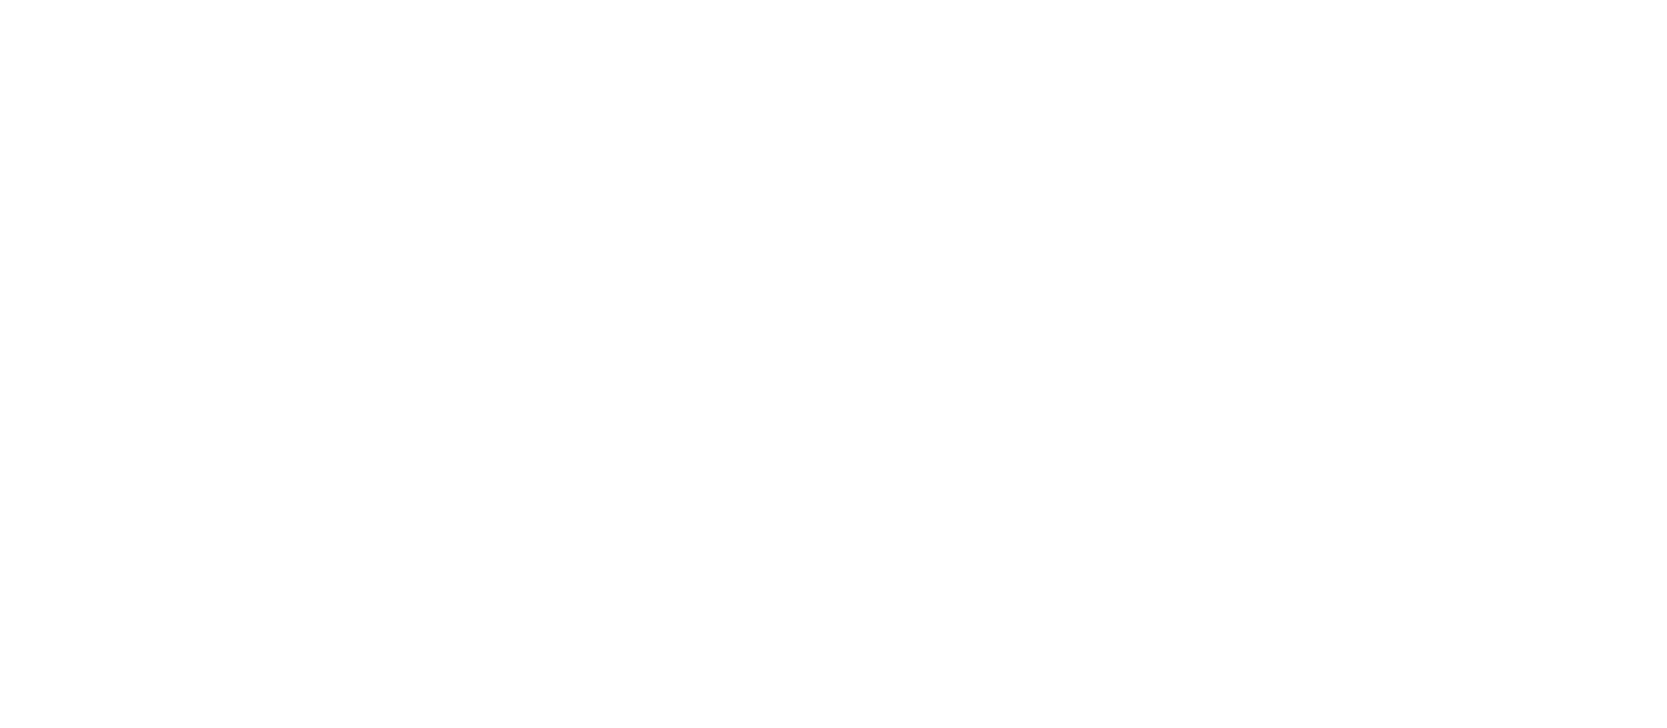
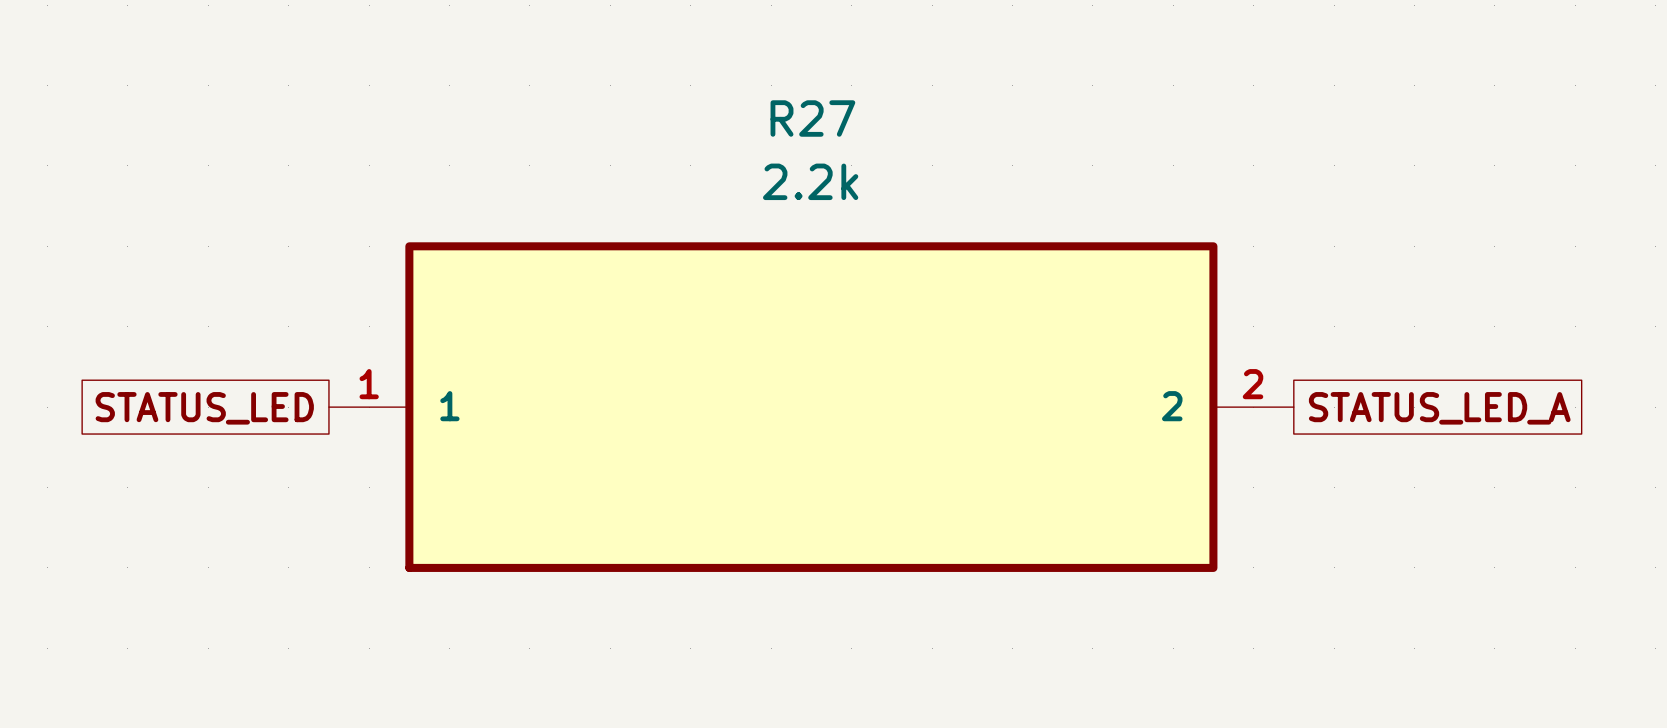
R27: none -> 2.2k (811, 407)
global label: none -> STATUS_LED (204, 408)
global label: none -> STATUS_LED_A (1439, 408)

